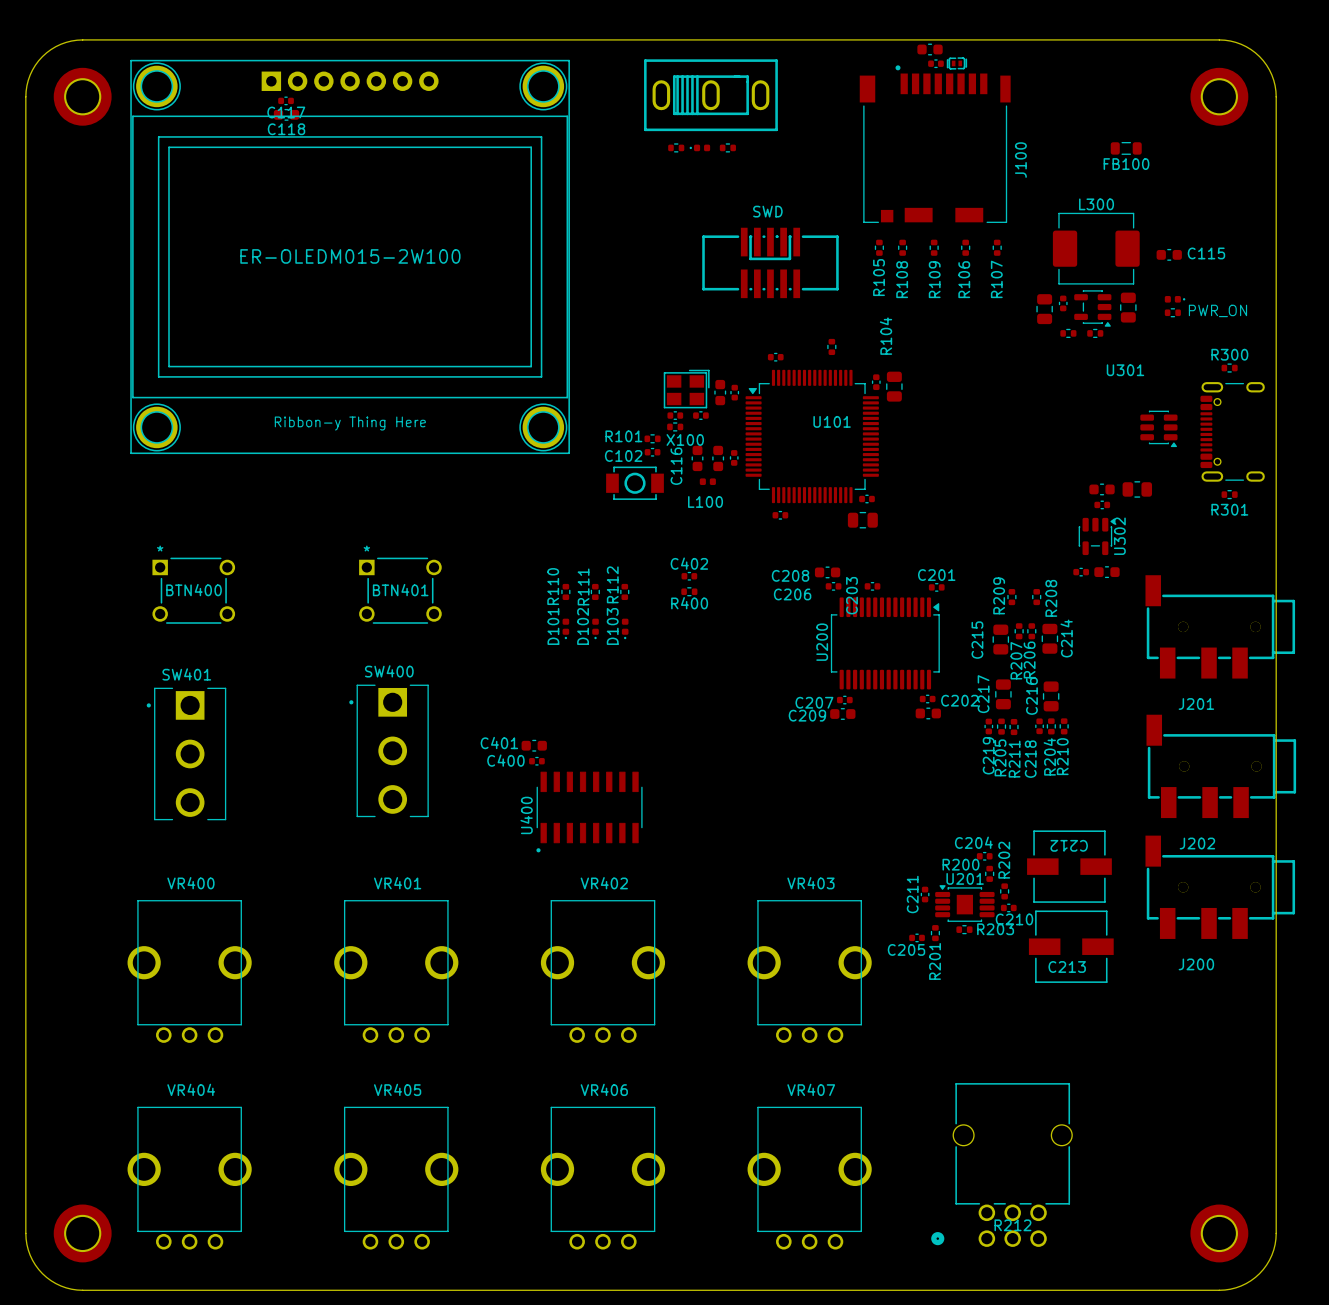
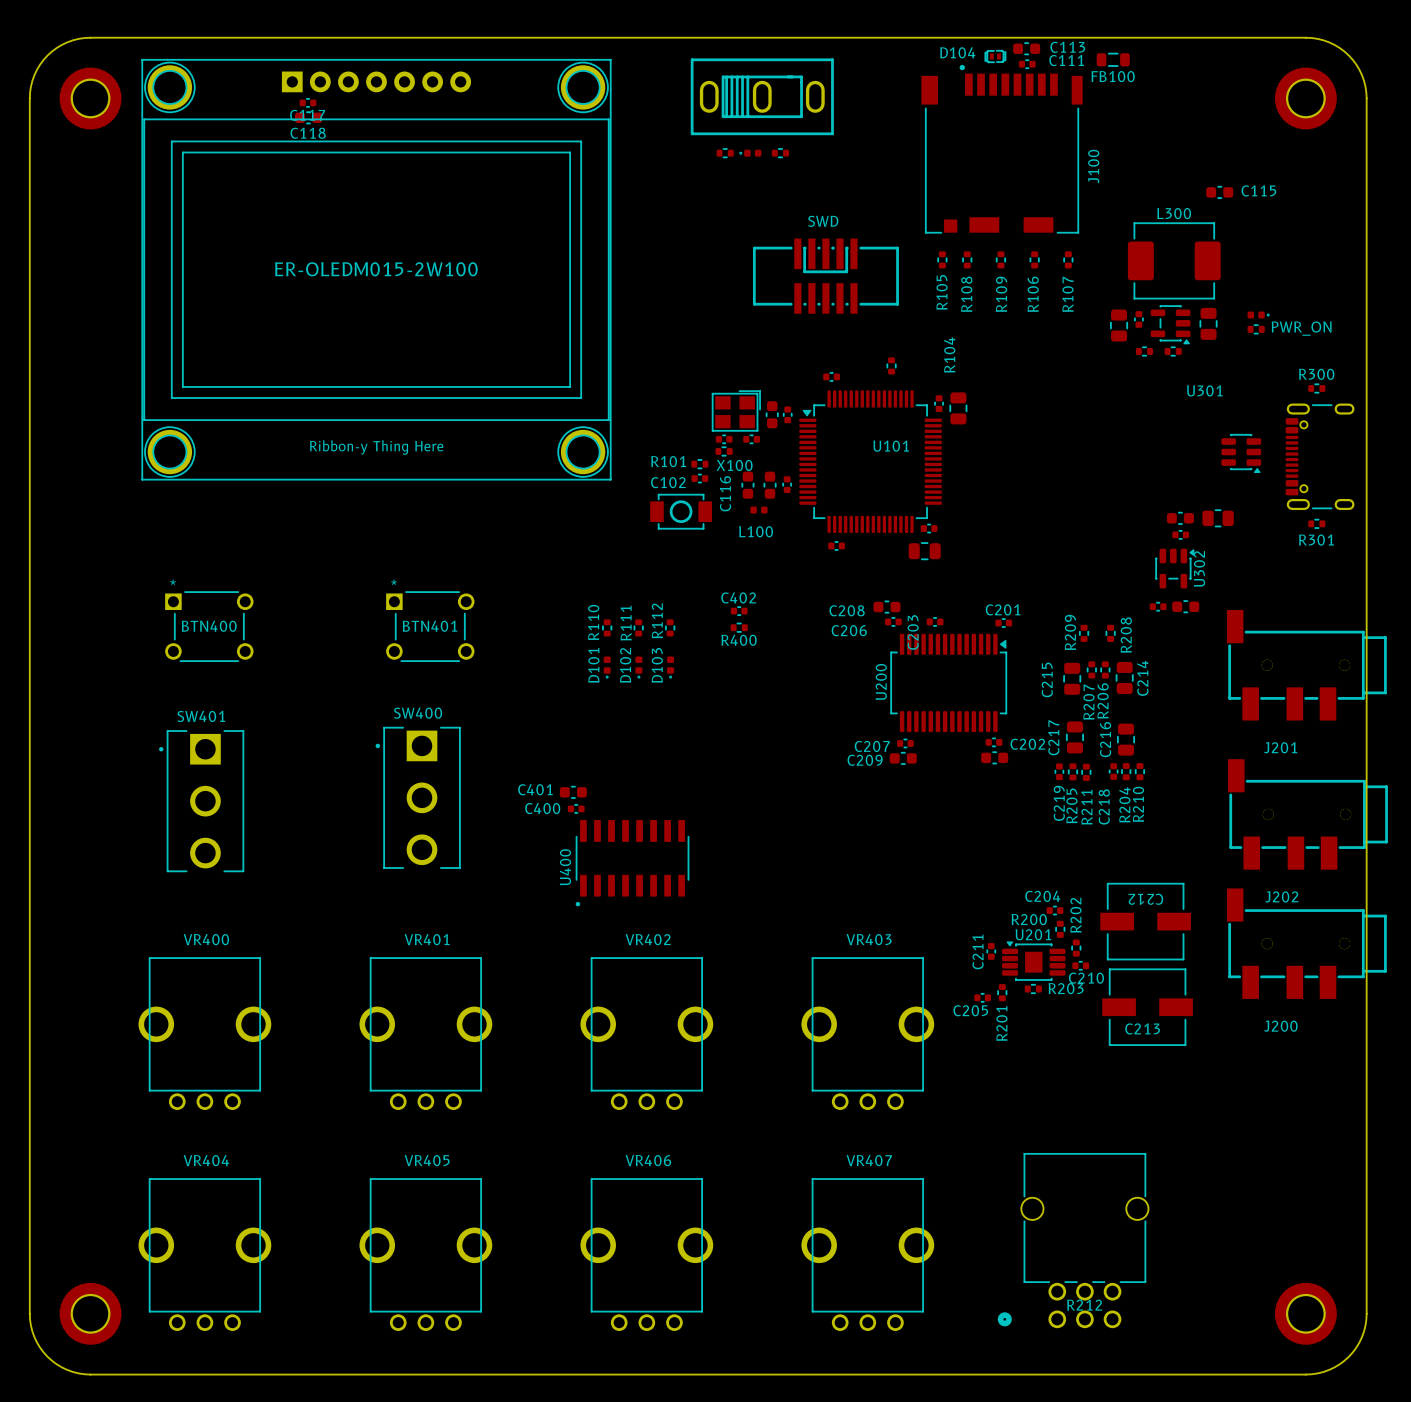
part: (930, 49) -> none
C113: none -> (1026, 48)
D104: none -> (995, 56)
part: (935, 63) -> none
part: (956, 63) -> none
C111: none -> (1027, 64)
FB100 position: (1126, 148) -> (1113, 59)
C115 position: (1169, 254) -> (1219, 192)

